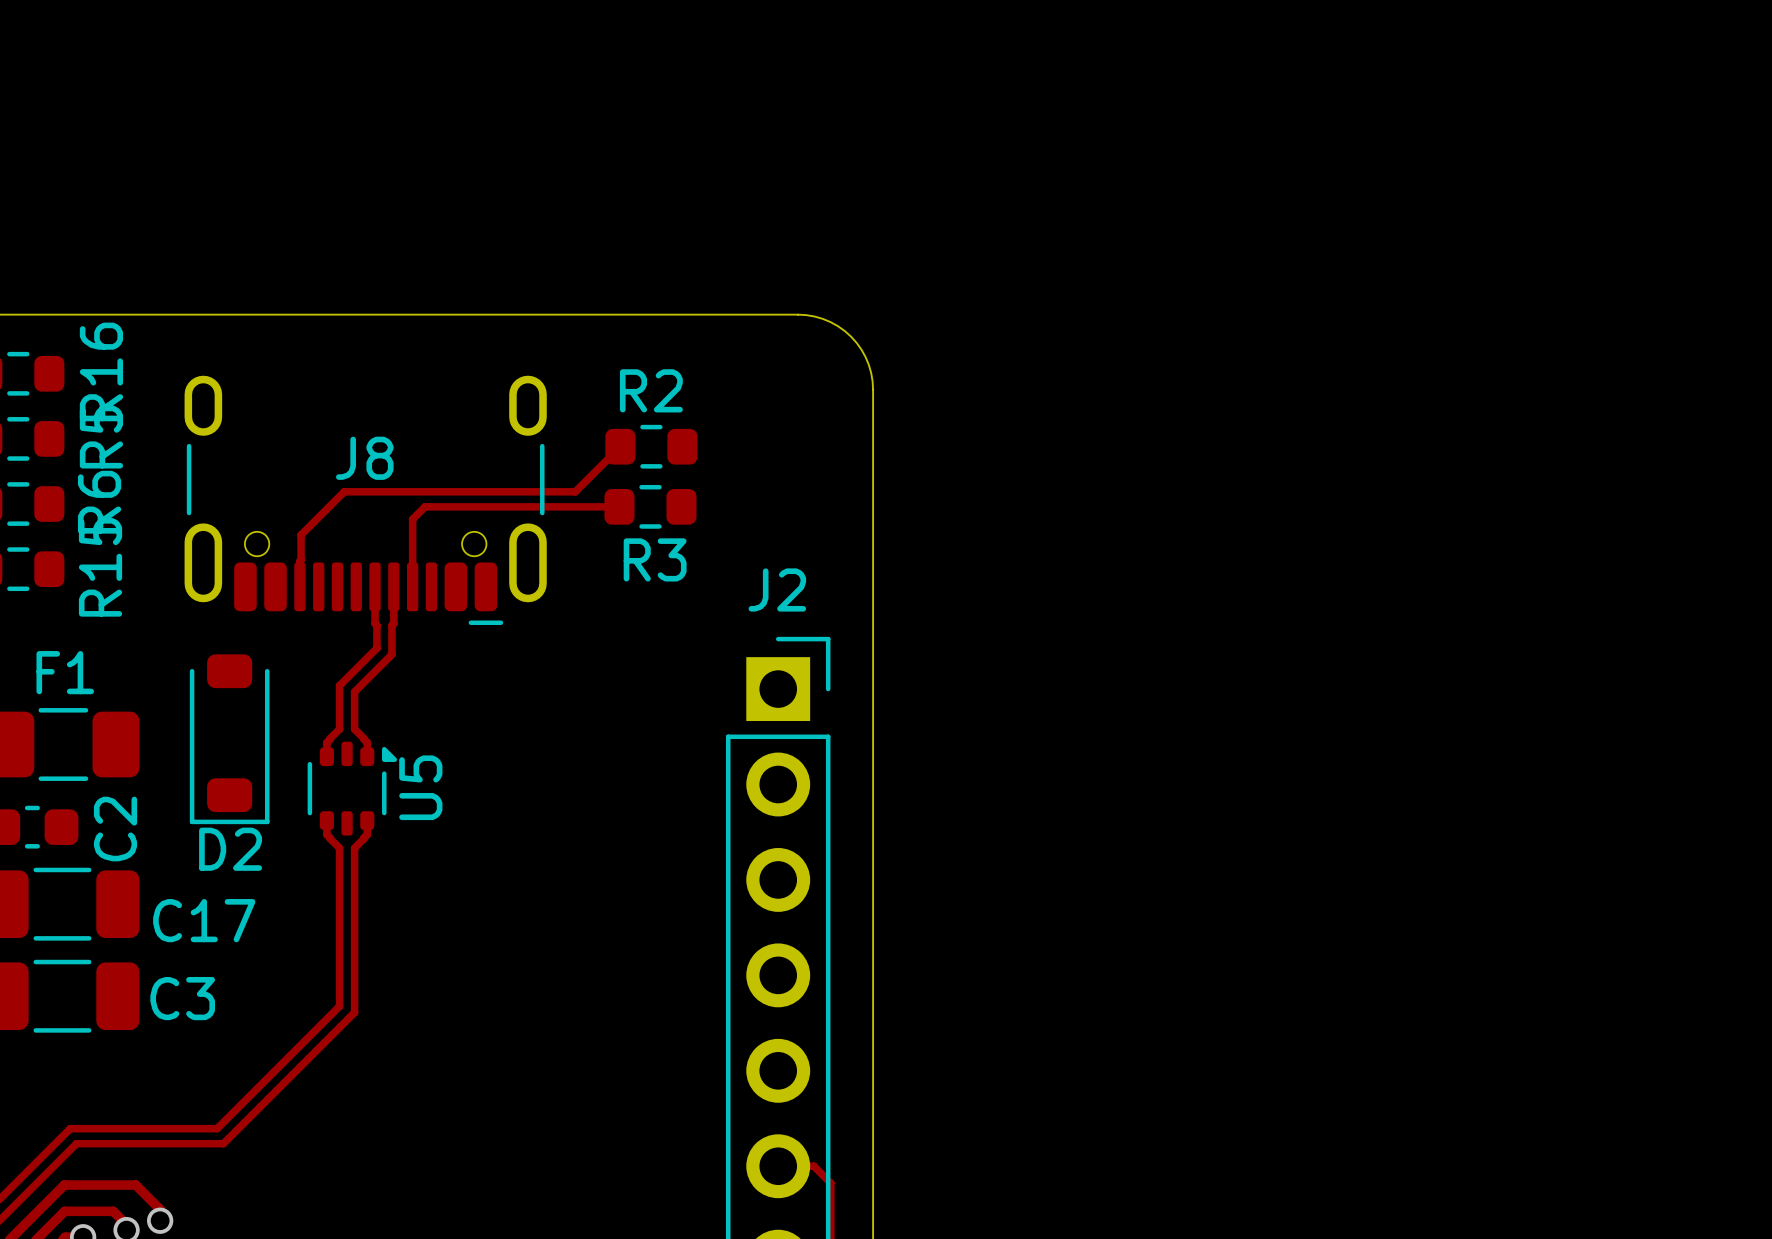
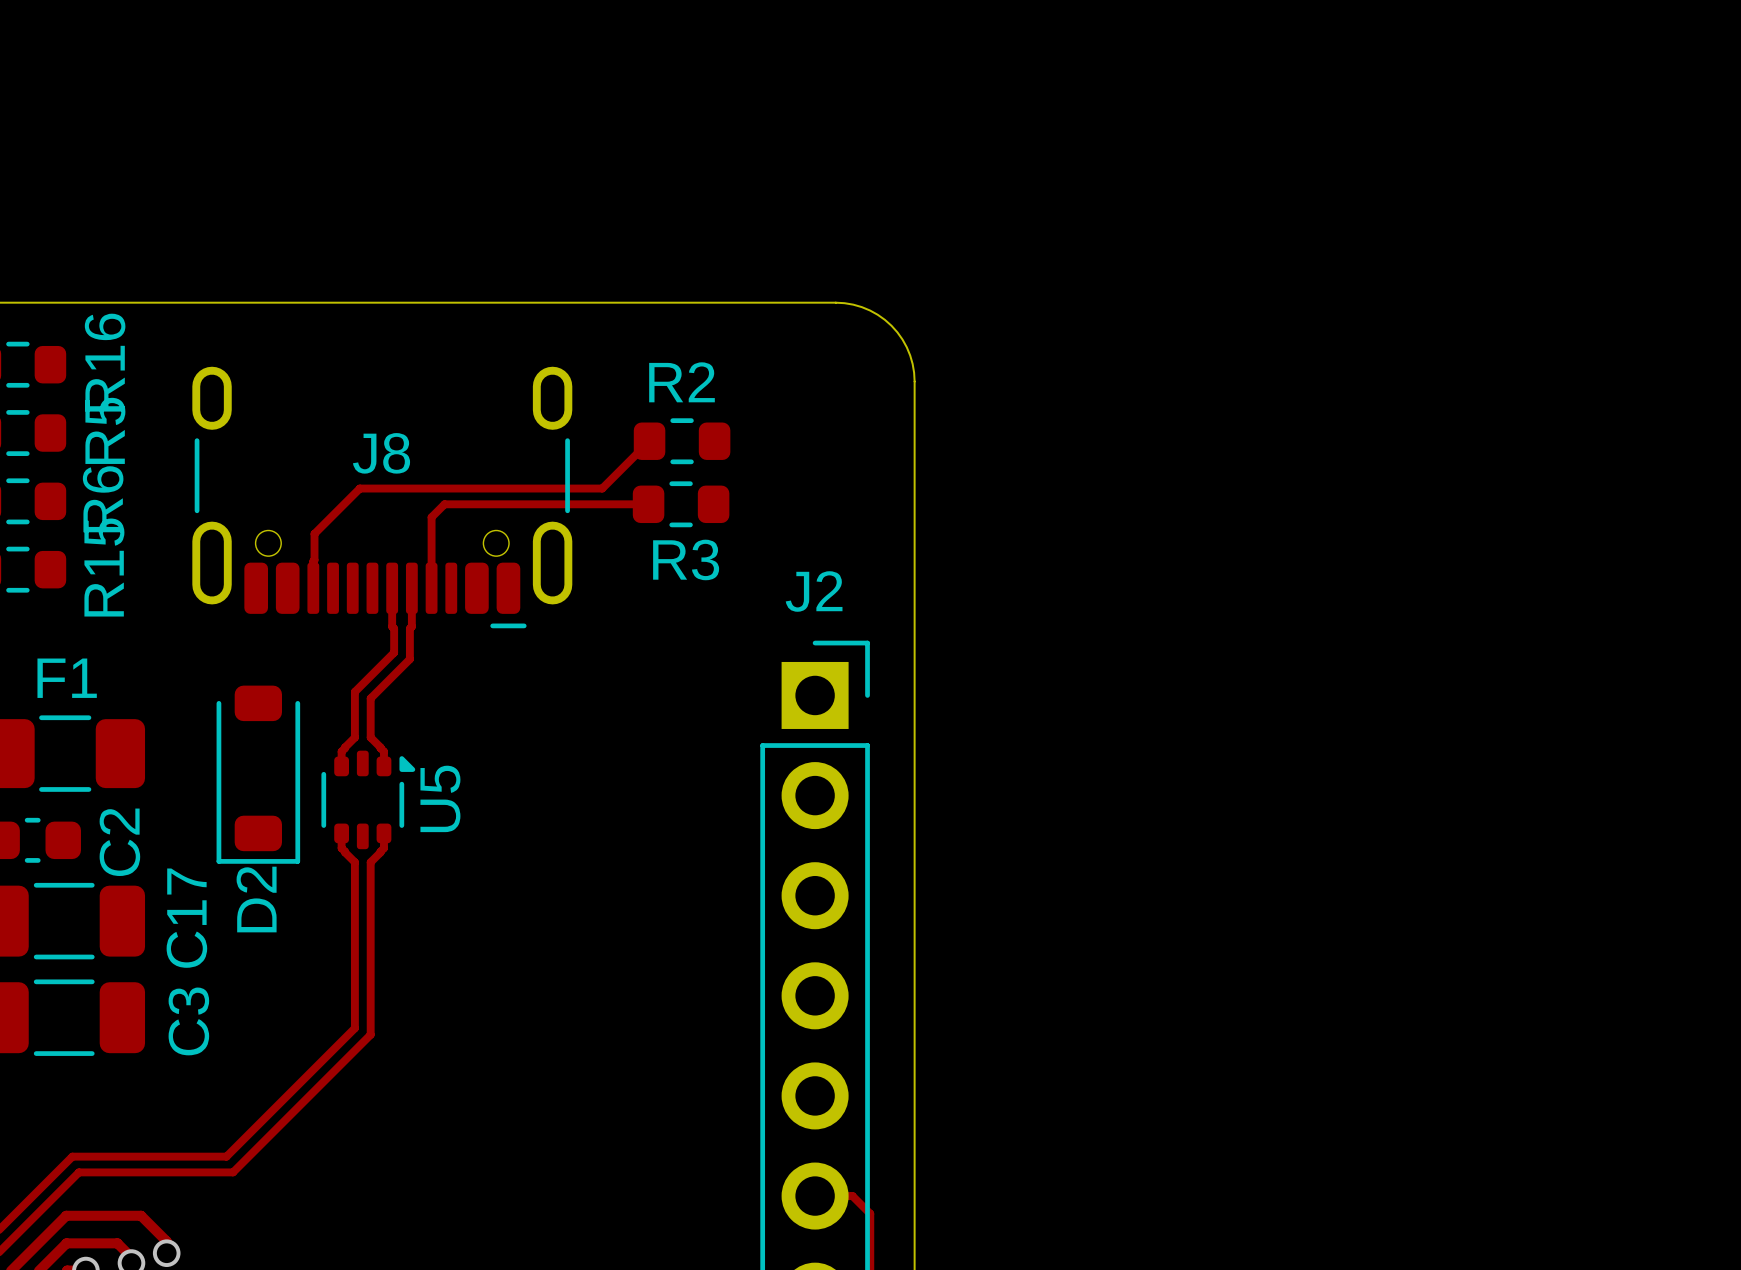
D2 position: (229, 739) -> (258, 774)
D2 name rotation: 0° (230, 849) -> 90° counterclockwise (256, 899)
C17 name rotation: 0° (204, 920) -> 90° counterclockwise (186, 918)
C3 name rotation: 0° (182, 998) -> 90° counterclockwise (188, 1021)

